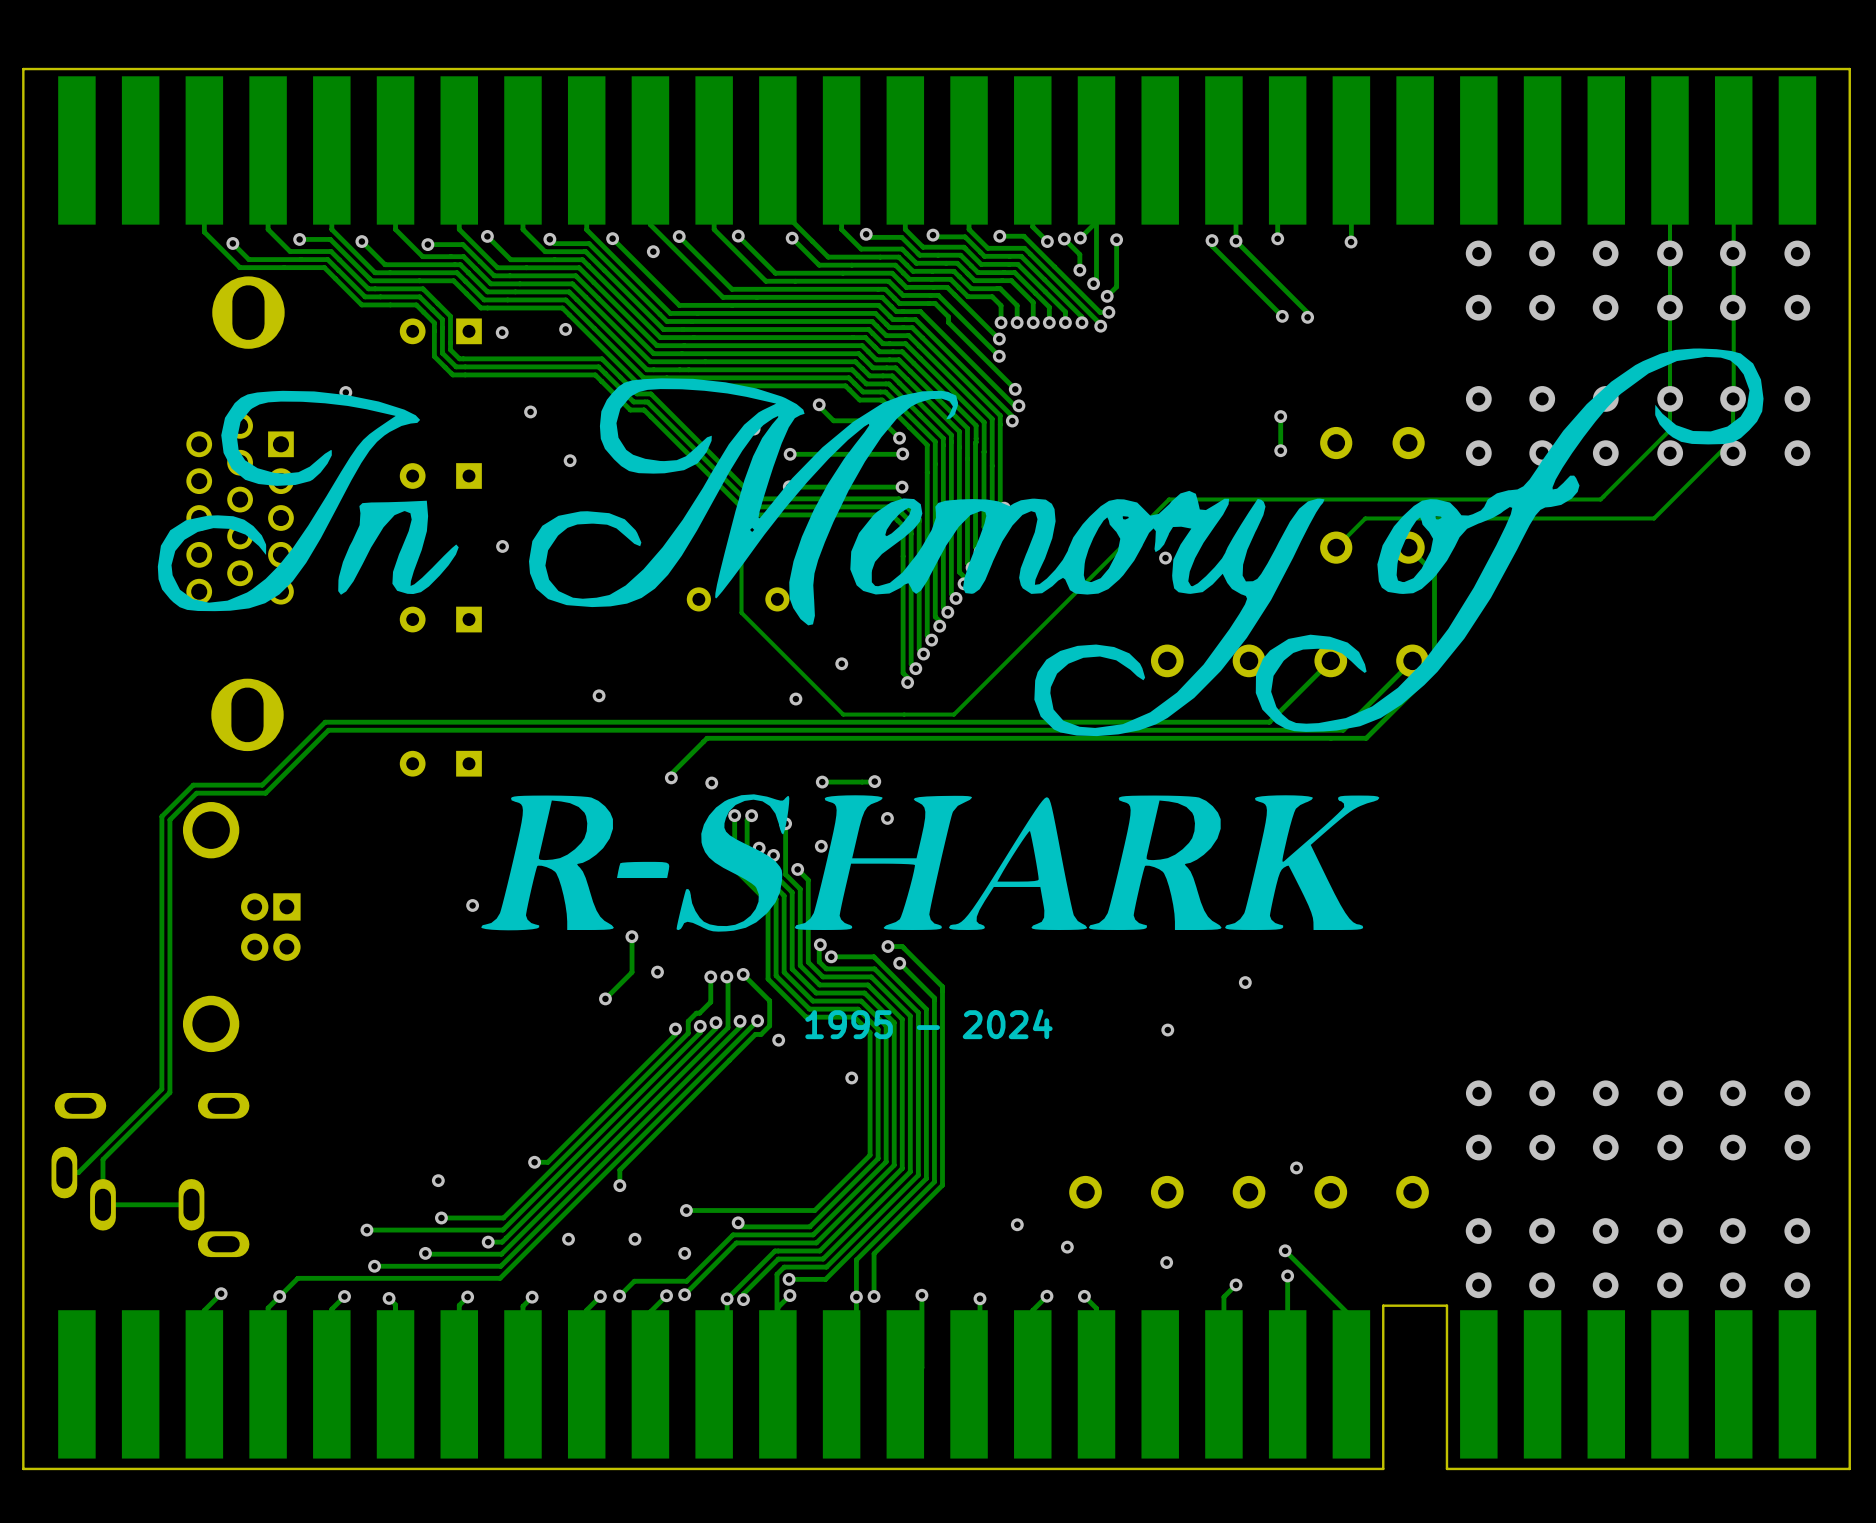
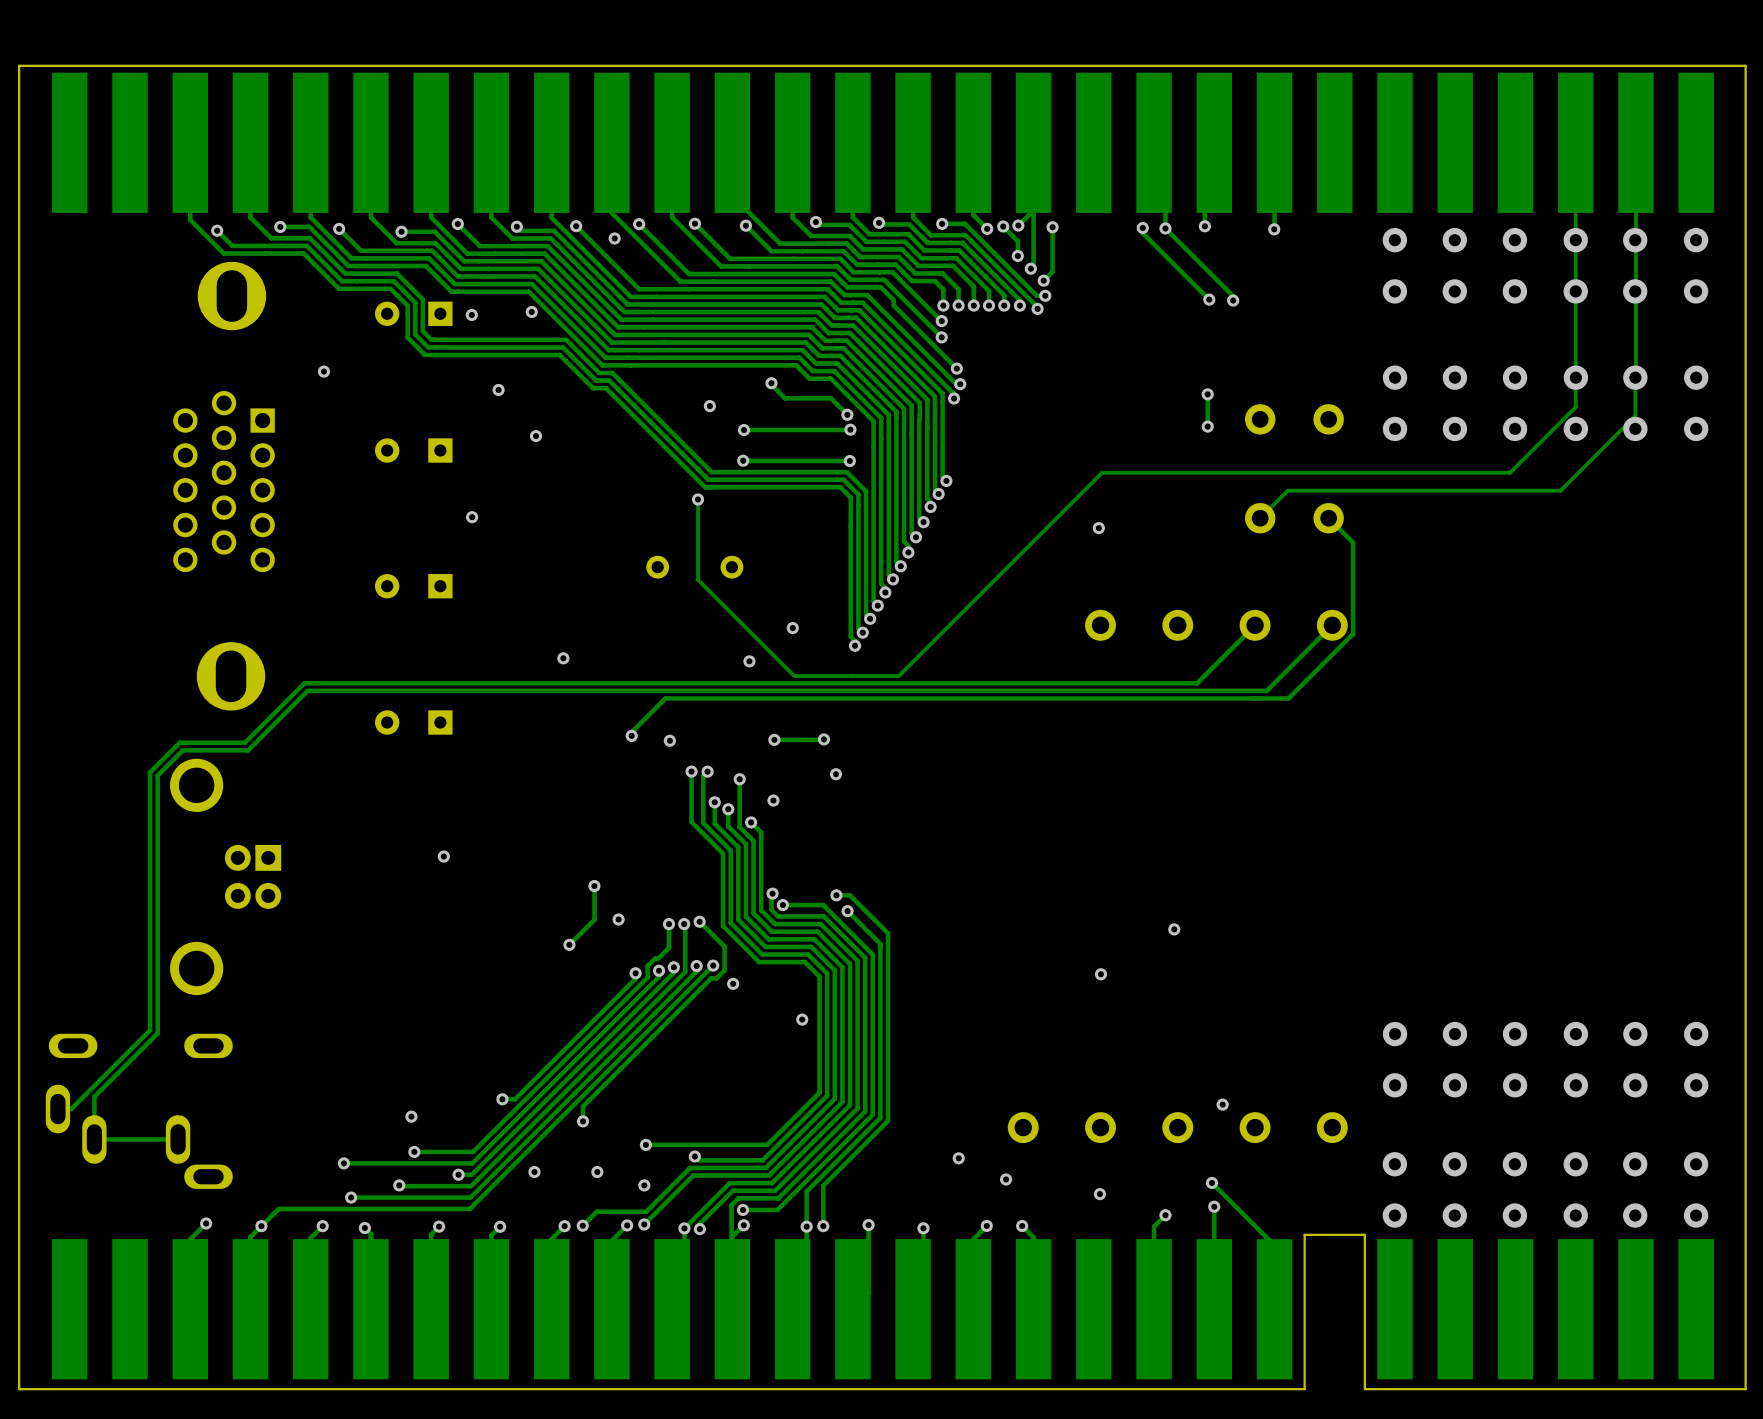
drawing: [157, 348, 1764, 737] -> none
drawing: [481, 794, 1380, 932] -> none
text: 1995 - 2024 (928, 1024) -> none

